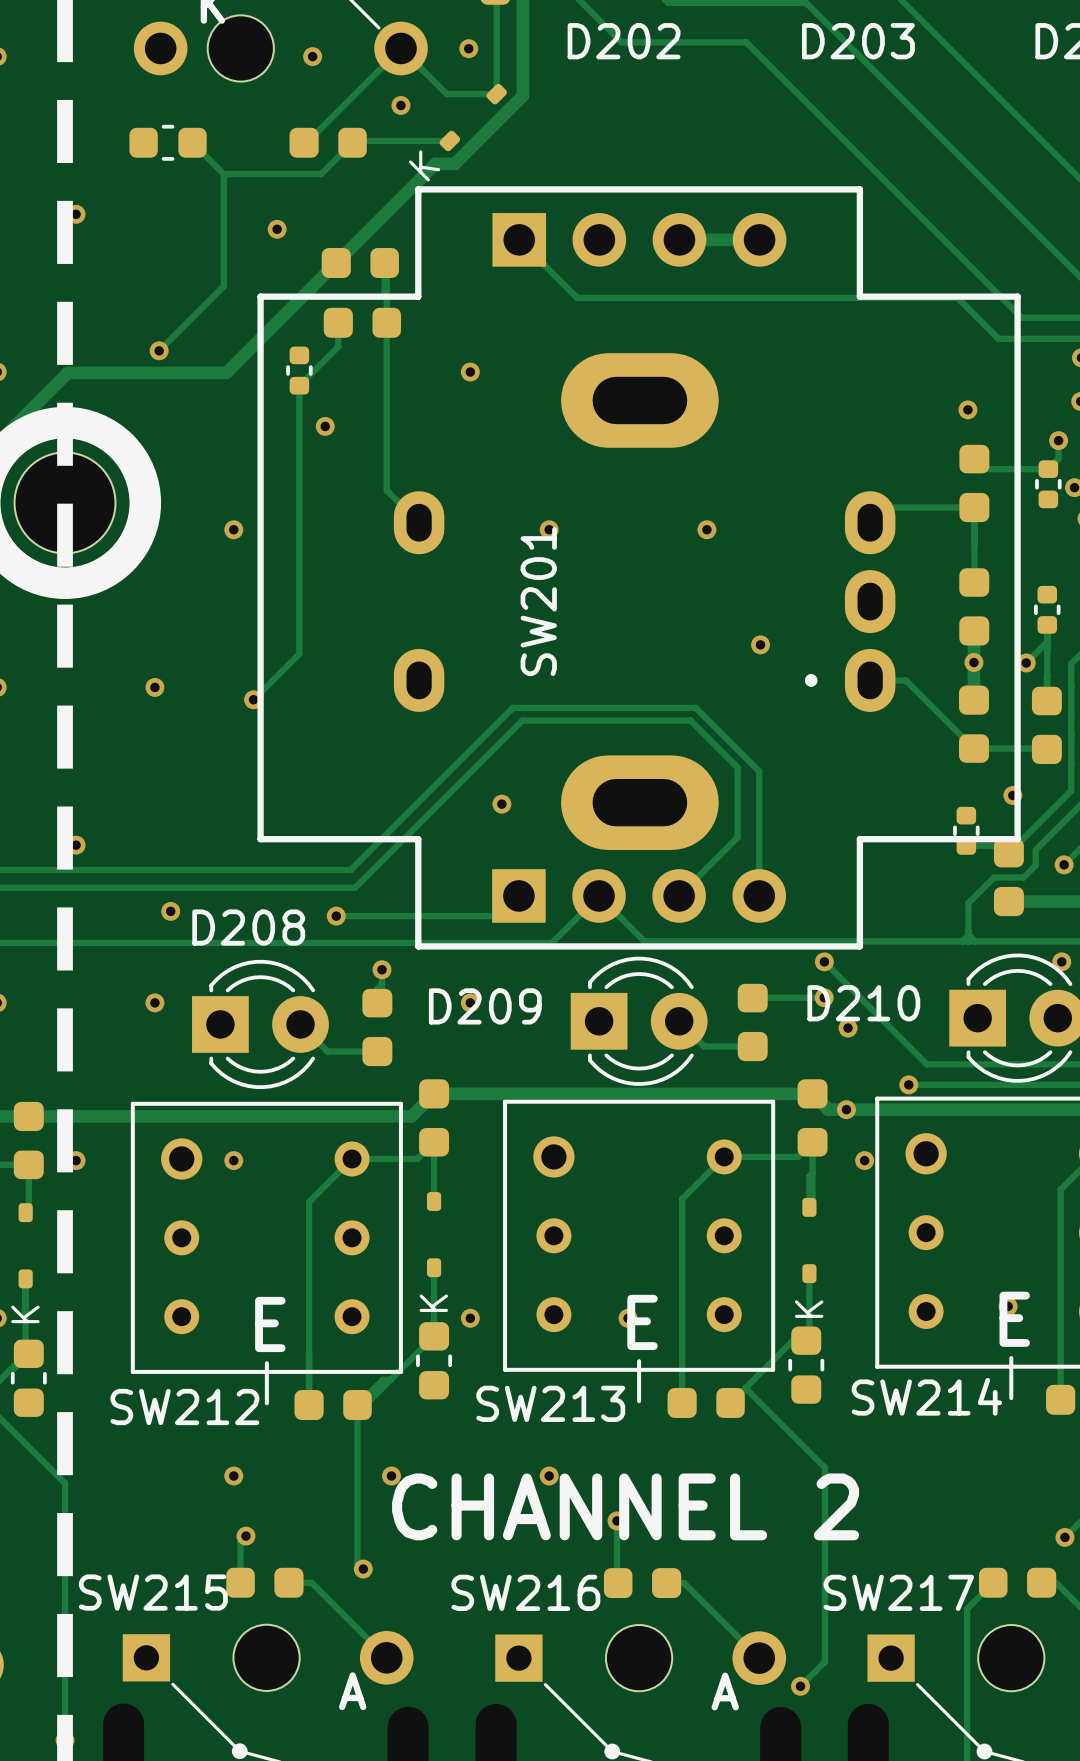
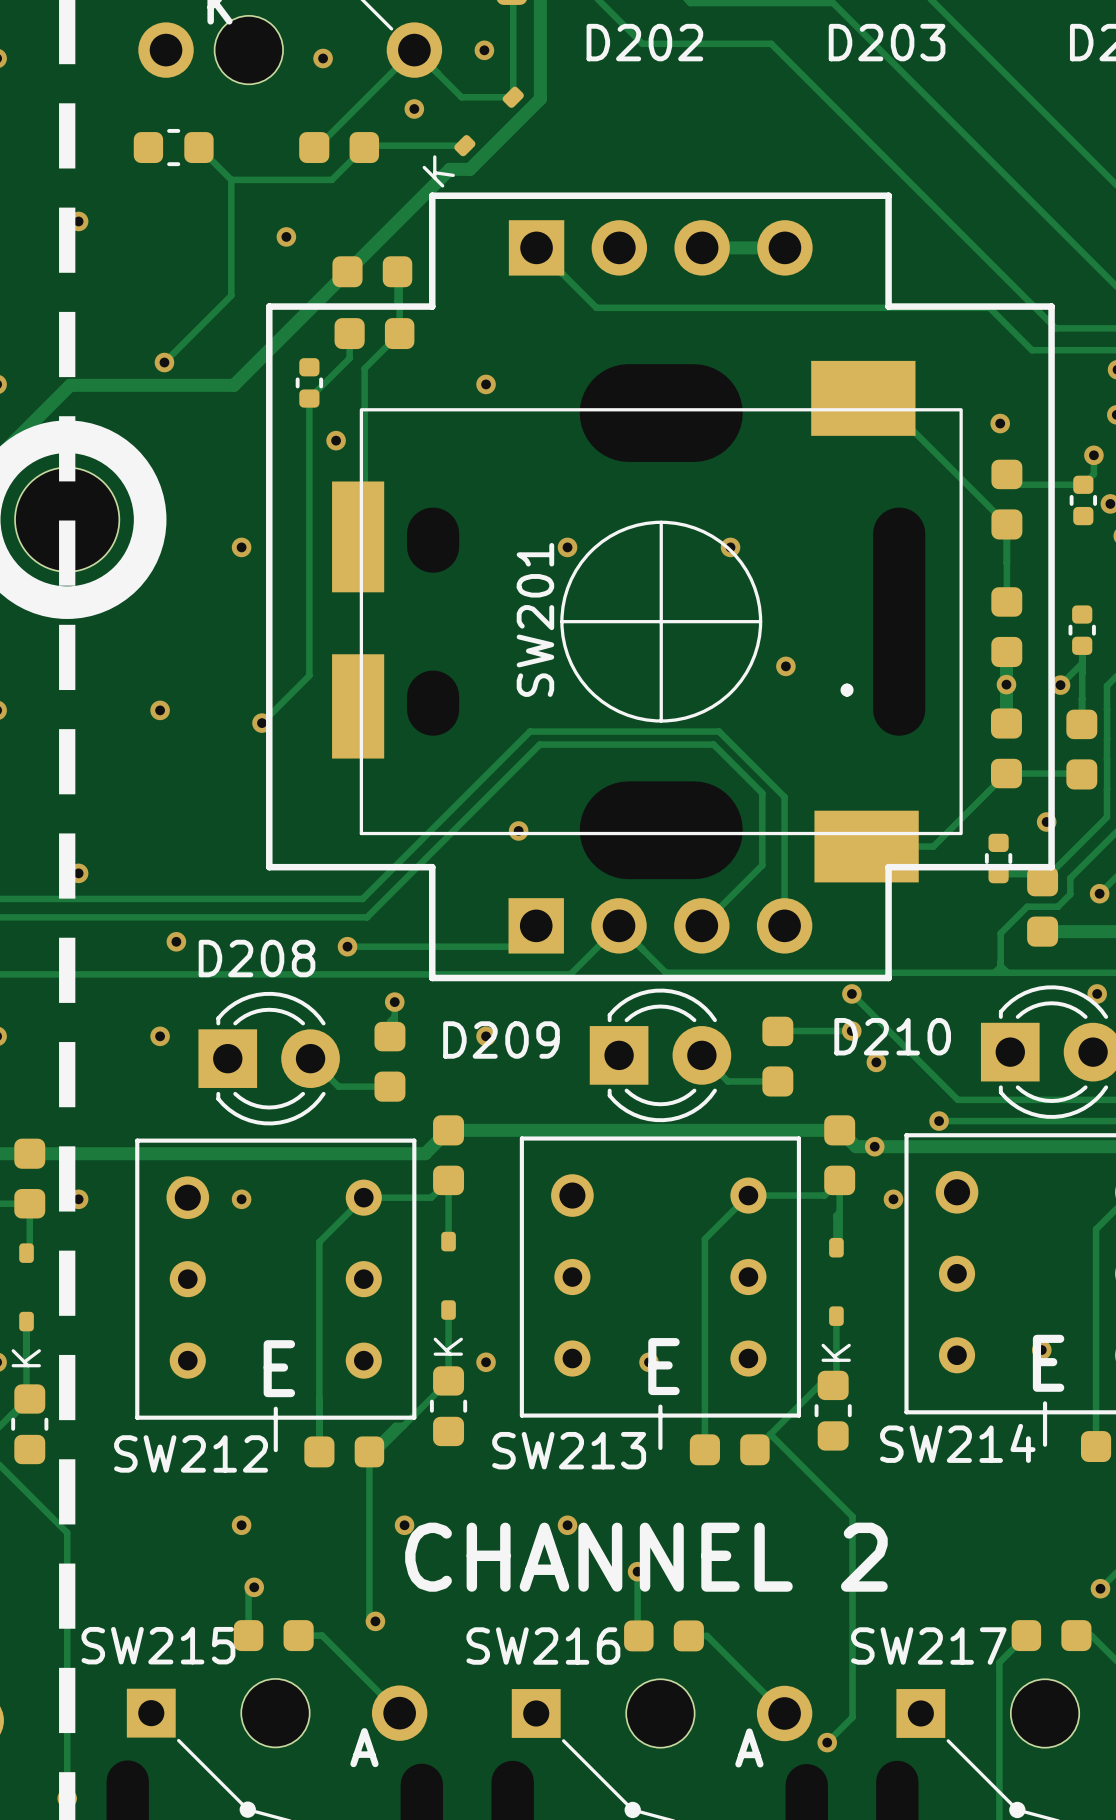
track: (386, 322) (386, 490) (419, 522) -> (399, 333) (364, 368) (364, 540)
SW201 footprint: [393, 353, 896, 850] -> [332, 360, 963, 883]
track: (885, 507) (974, 507) -> (880, 398) (1006, 524)
track: (870, 680) (905, 680) (973, 748) -> (866, 846) (933, 846) (1006, 773)

